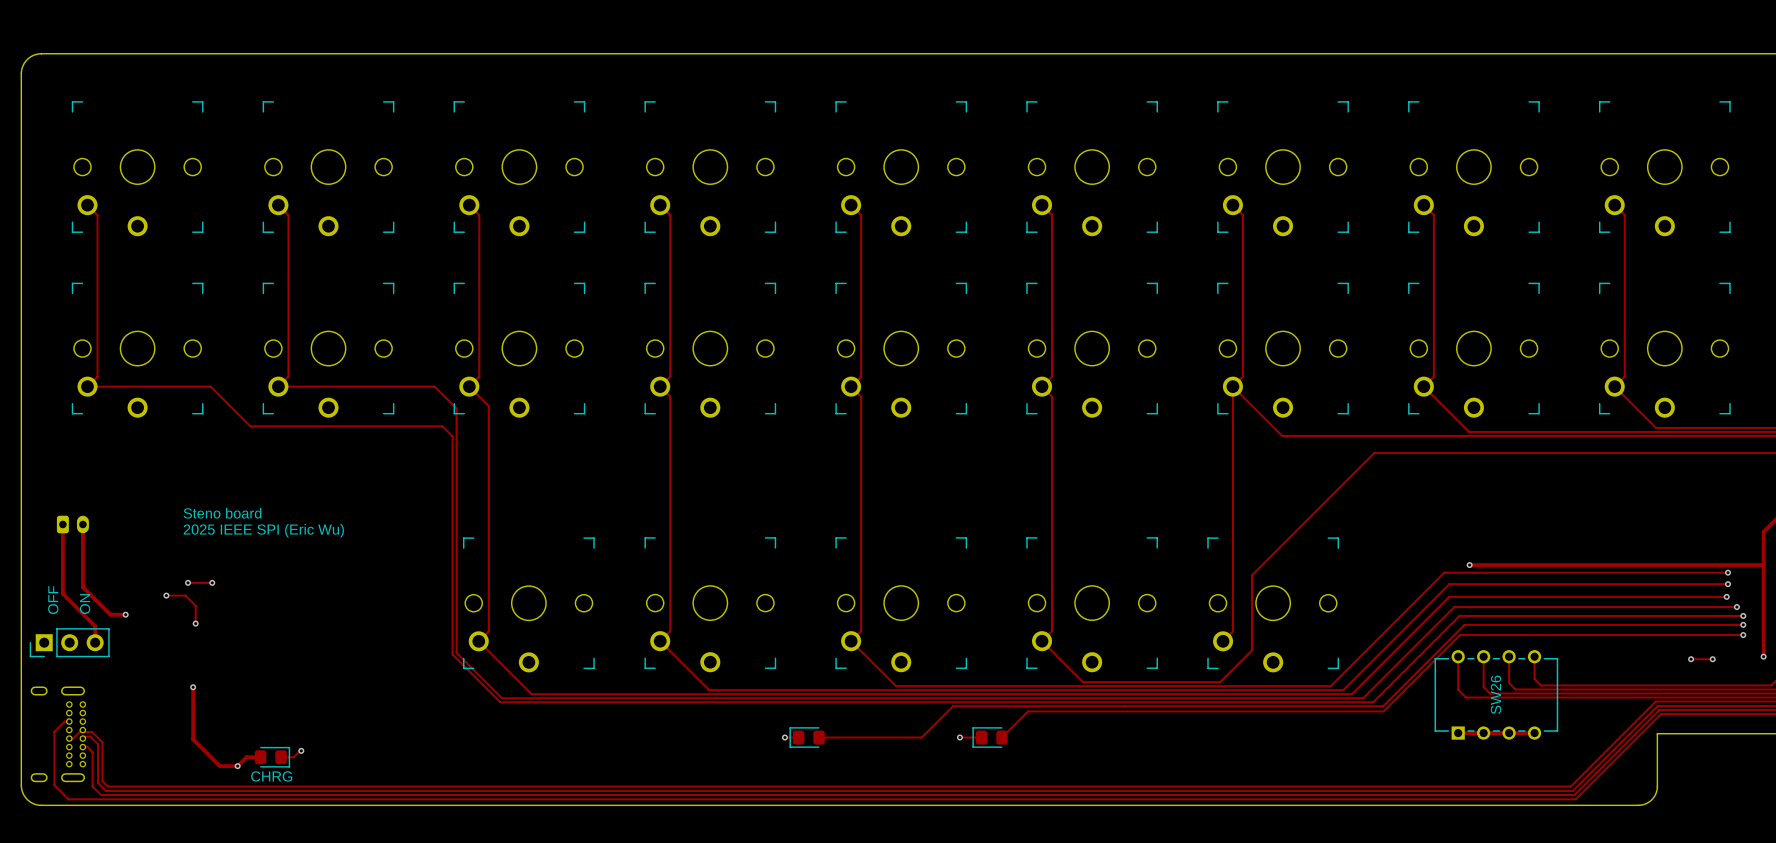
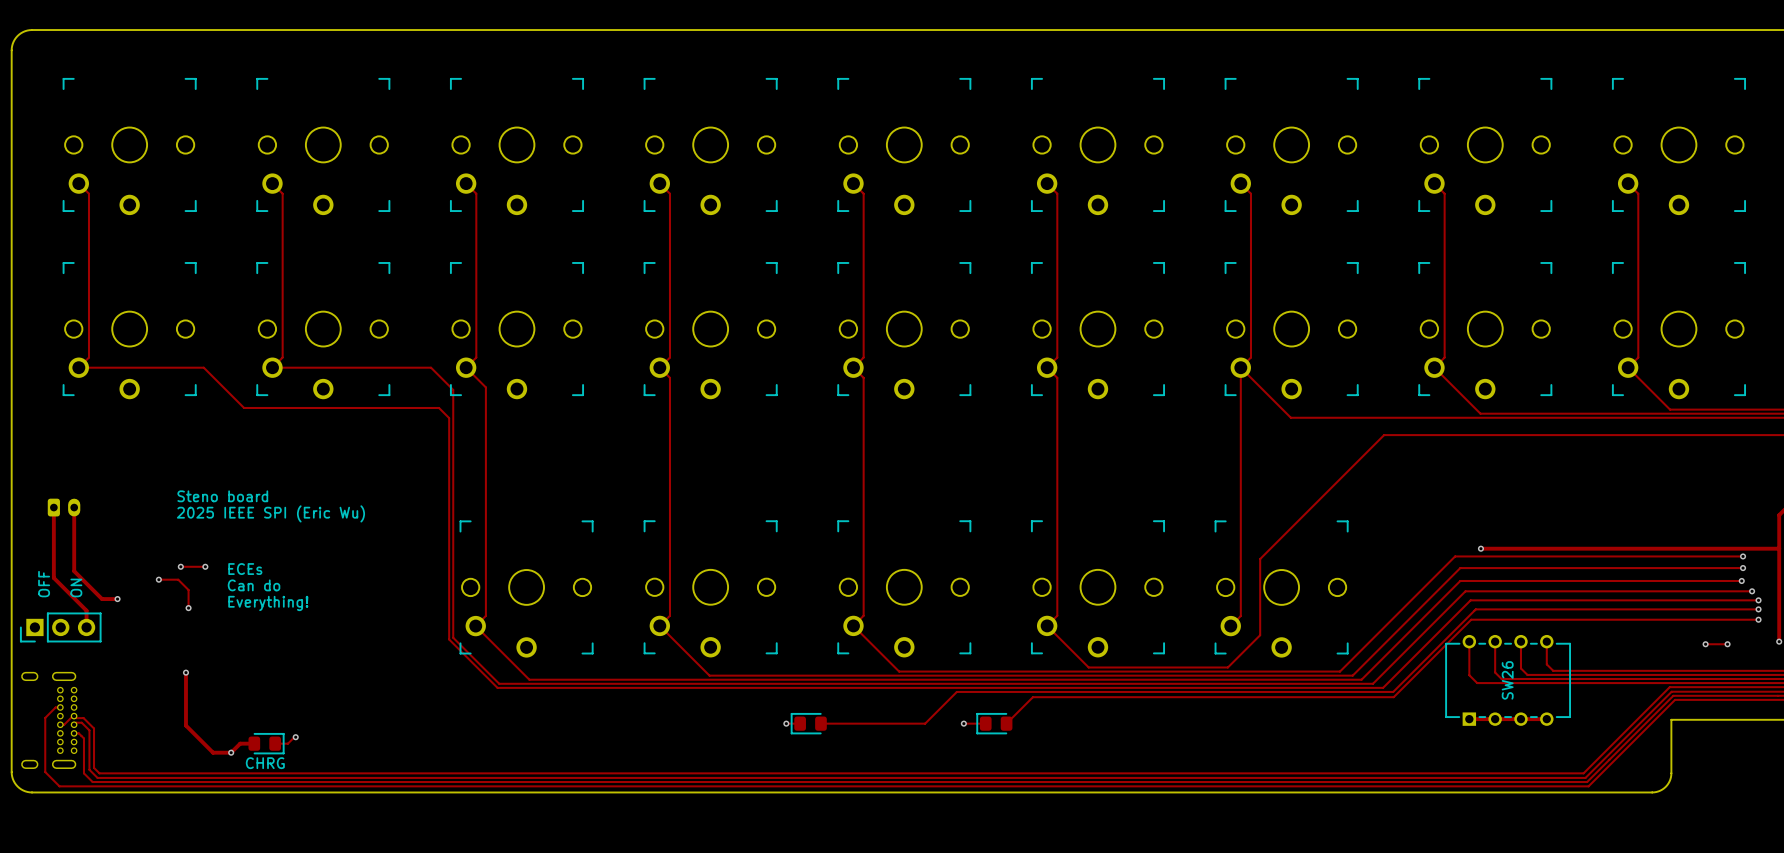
text: none -> ECEs (245, 569)
text: none -> Can do (254, 585)
text: none -> Everything! (268, 603)

